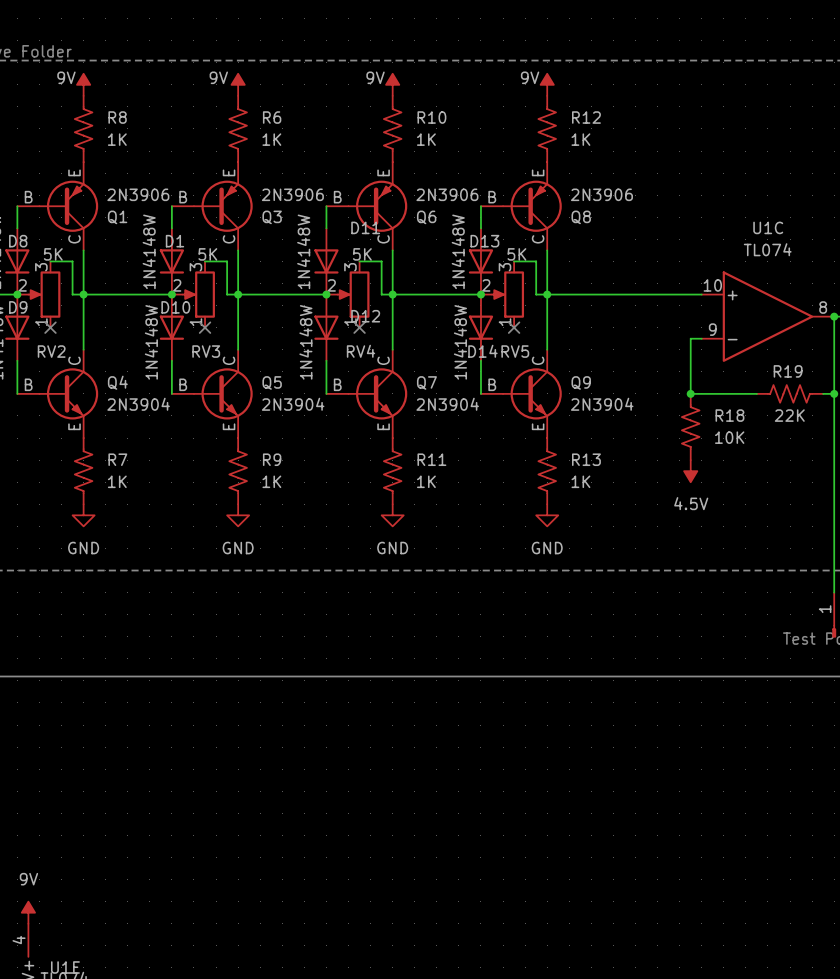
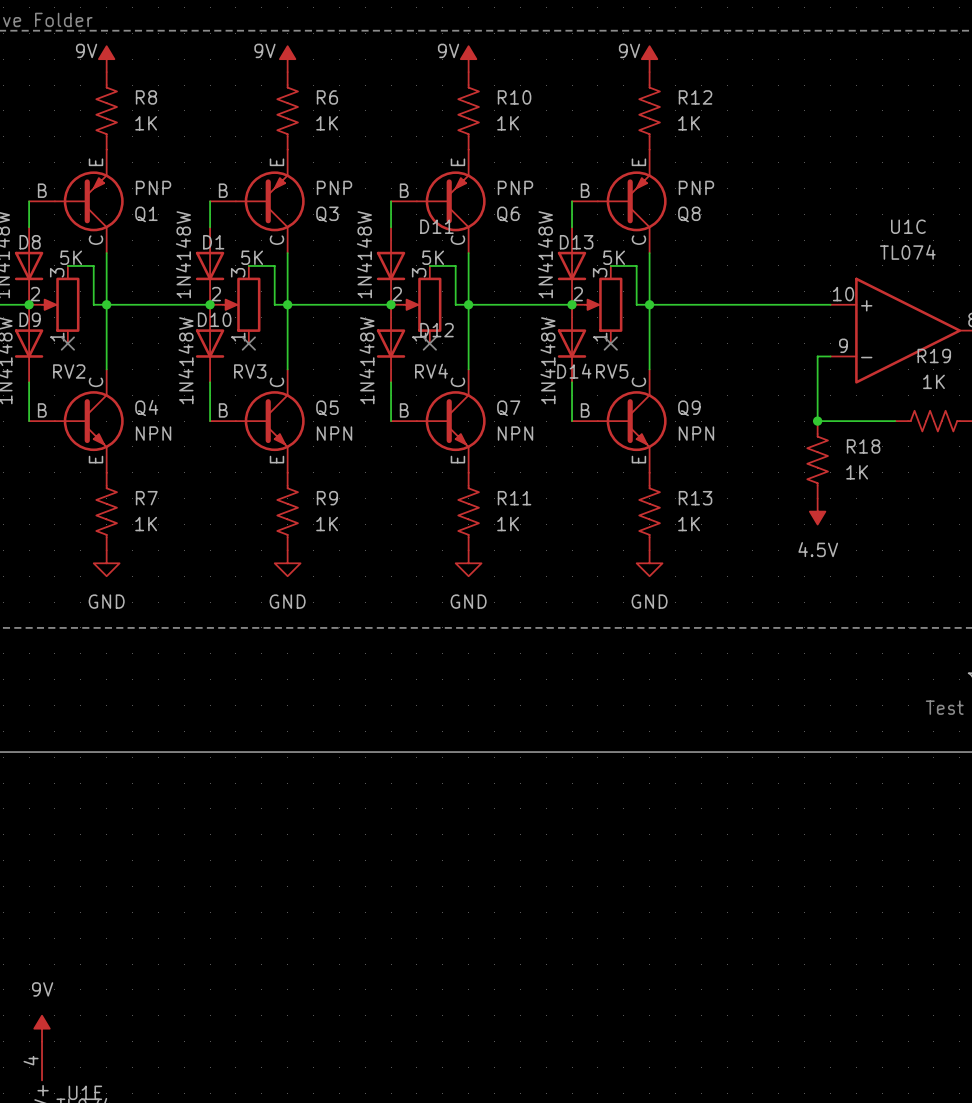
Q1 value: 2N3906 (138, 194) -> PNP (153, 187)
Q3 value: 2N3906 (292, 194) -> PNP (334, 187)
Q6 value: 2N3906 (447, 194) -> PNP (515, 187)
Q8 value: 2N3906 (601, 194) -> PNP (696, 187)
R19 name position: R19 (788, 371) -> R19 (934, 355)
Q4 value: 2N3904 (138, 404) -> NPN (153, 433)
Q5 value: 2N3904 (293, 404) -> NPN (334, 433)
Q7 value: 2N3904 (447, 404) -> NPN (515, 433)
Q9 value: 2N3904 (602, 404) -> NPN (696, 433)
R19 value: 22K (789, 415) -> 1K (933, 381)
R18 value: 10K (729, 437) -> 1K (857, 472)

